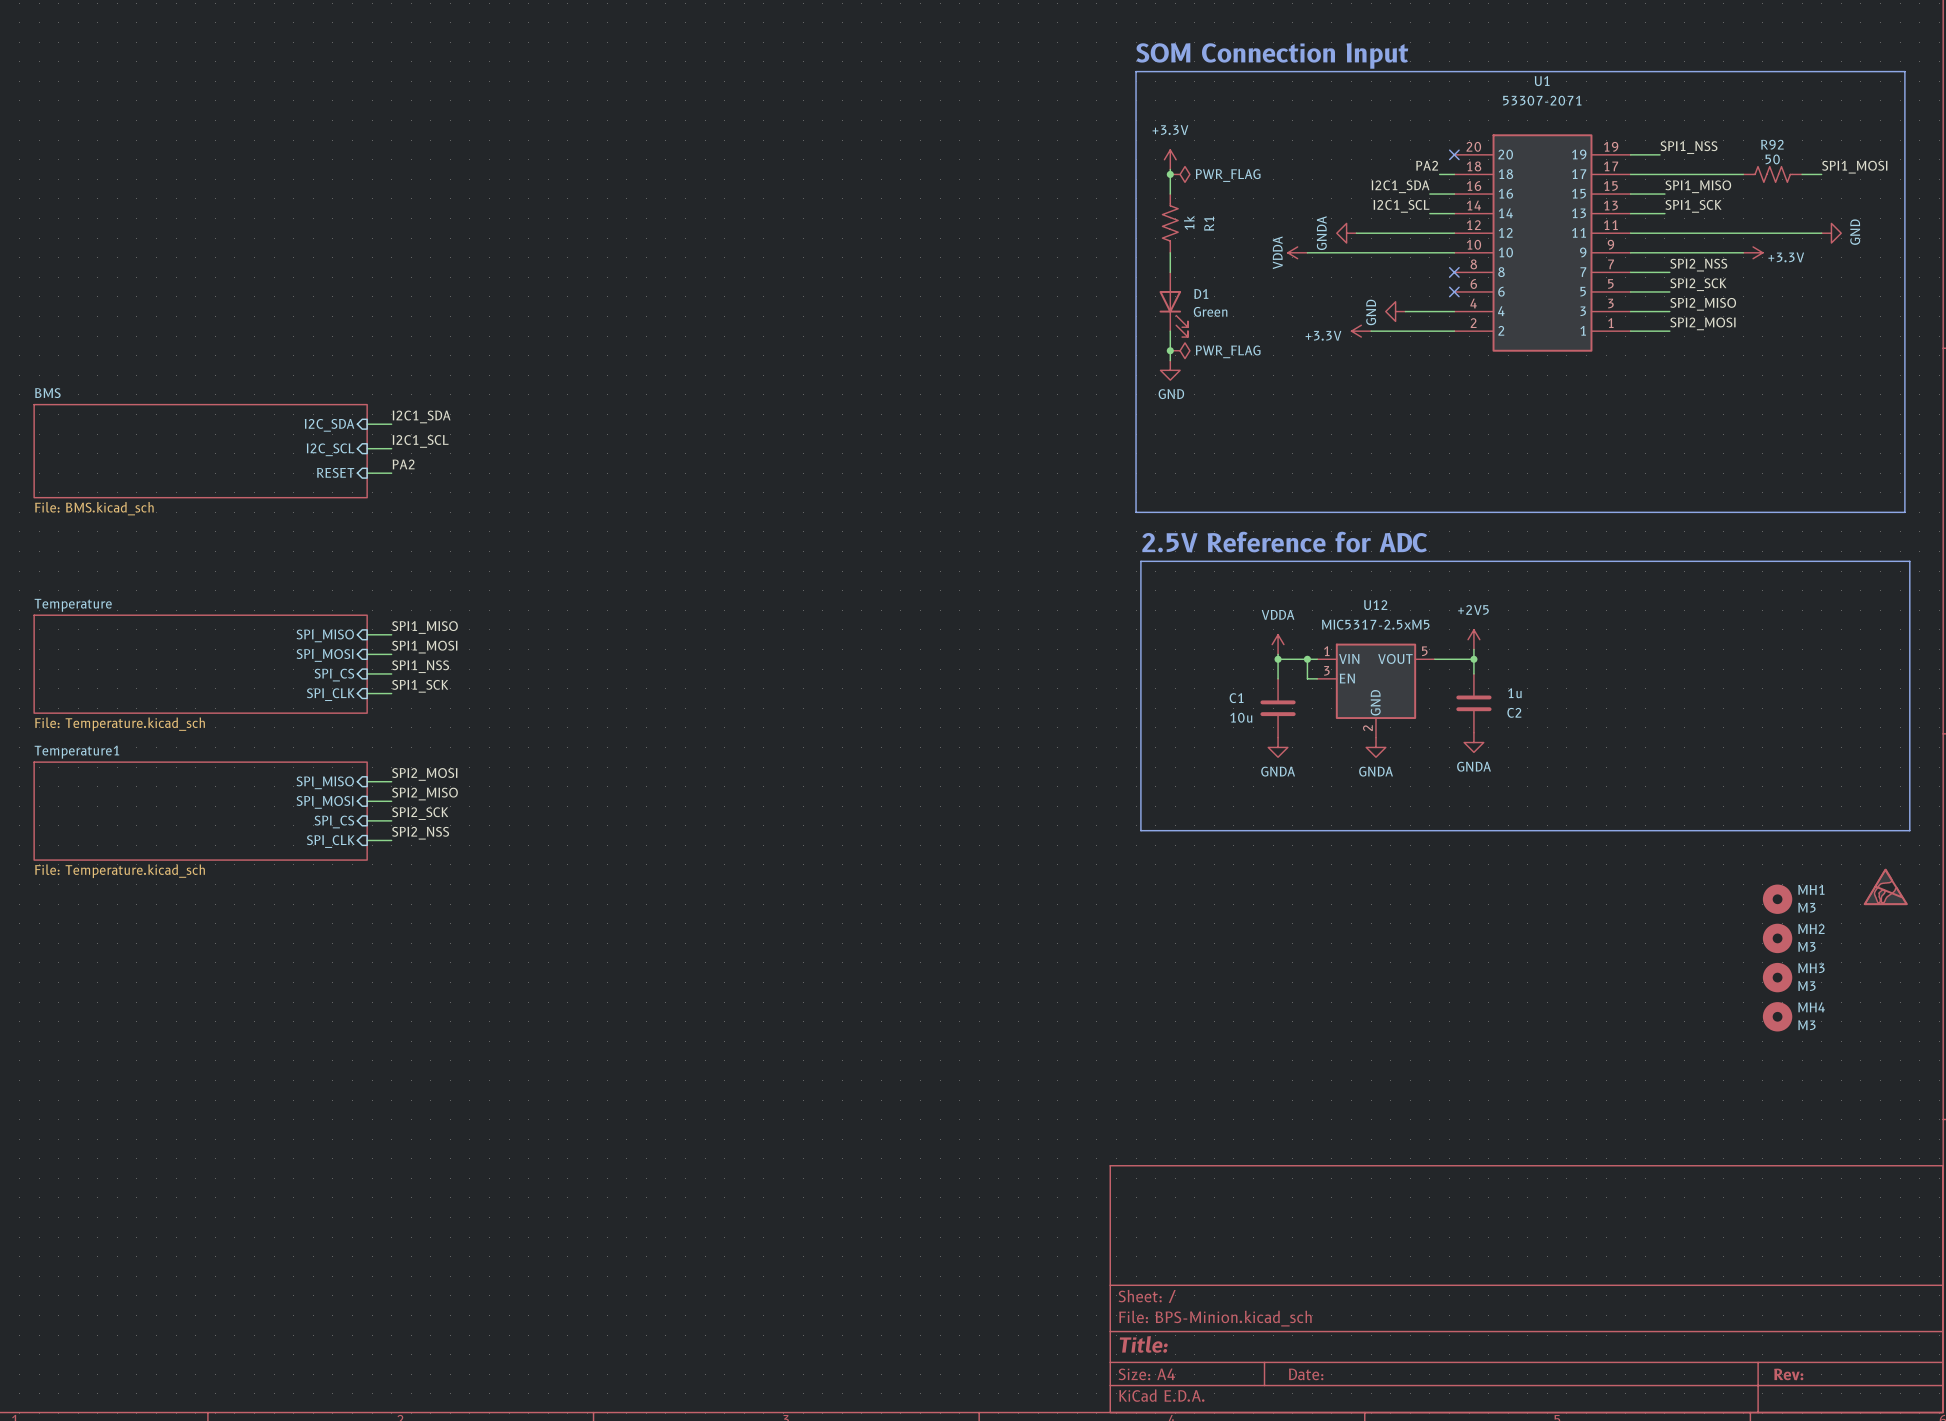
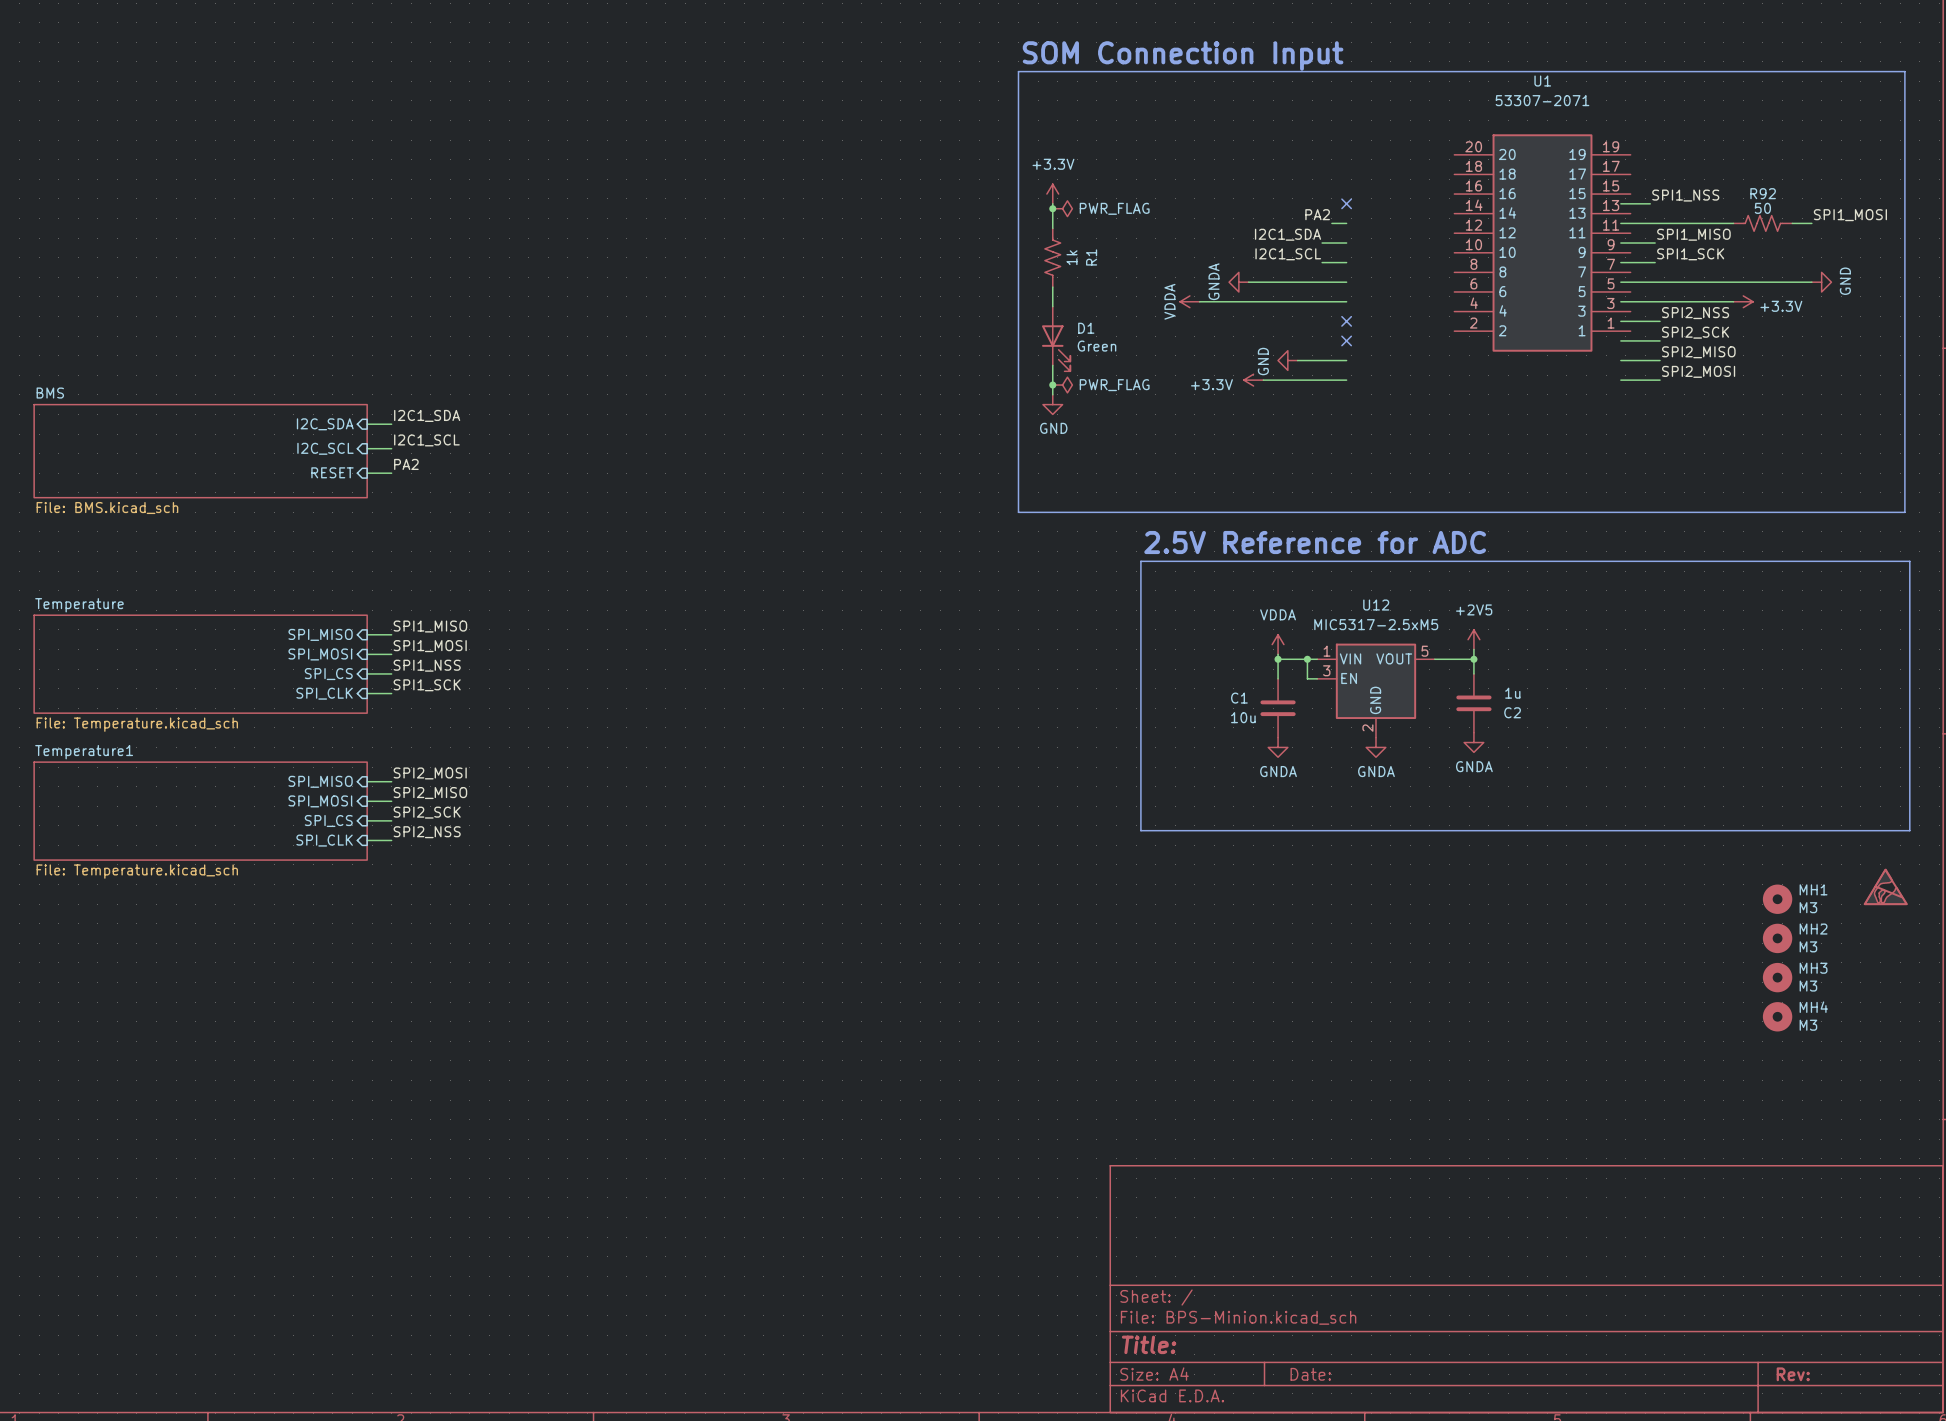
text position: SOM Connection Input (1272, 55) -> SOM Connection Input (1183, 55)
line: (1136, 71) (1136, 512) -> (1136, 71) (1018, 71) (1018, 512) (1136, 512)
label position: SPI1_NSS (1689, 147) -> SPI1_NSS (1685, 195)
no-connect mark: (1454, 154) -> none
wire: (1630, 154) (1660, 154) -> (1620, 203) (1650, 203)
power symbol: +3.3V (1170, 159) -> none
label position: PA2 (1427, 165) -> PA2 (1317, 214)
label position: SPI1_MOSI (1854, 167) -> SPI1_MOSI (1850, 215)
wire: (1170, 169) (1170, 194) -> (1052, 203) (1052, 228)
junction: (1170, 174) -> none
power symbol: PWR_FLAG (1180, 174) -> none
wire: (1439, 174) (1454, 174) -> (1331, 223) (1346, 223)
wire: (1630, 174) (1743, 174) -> (1620, 223) (1733, 223)
R92 position: (1772, 174) -> (1762, 223)
wire: (1802, 174) (1821, 174) -> (1792, 223) (1811, 223)
label position: I2C1_SDA (1400, 186) -> I2C1_SDA (1288, 234)
label position: SPI1_MISO (1698, 186) -> SPI1_MISO (1693, 234)
power symbol: none -> +3.3V (1052, 194)
wire: (1429, 194) (1454, 194) -> (1322, 243) (1346, 243)
wire: (1630, 194) (1664, 194) -> (1620, 243) (1655, 243)
no-connect mark: none -> (1346, 203)
label position: I2C1_SCL (1401, 206) -> I2C1_SCL (1288, 254)
label position: SPI1_SCK (1693, 206) -> SPI1_SCK (1690, 254)
junction: none -> (1052, 208)
power symbol: none -> PWR_FLAG (1062, 208)
wire: (1429, 213) (1454, 213) -> (1322, 262) (1346, 262)
wire: (1630, 213) (1664, 213) -> (1620, 262) (1655, 262)
R1 position: (1170, 223) -> (1052, 257)
power symbol position: GNDA (1346, 233) -> GNDA (1238, 282)
wire: (1356, 233) (1454, 233) -> (1248, 282) (1346, 282)
wire: (1630, 233) (1821, 233) -> (1620, 282) (1811, 282)
power symbol position: GND (1831, 233) -> GND (1821, 282)
wire: (1170, 252) (1170, 272) -> (1052, 287) (1052, 306)
power symbol position: VDDA (1297, 252) -> VDDA (1189, 301)
wire: (1307, 252) (1454, 252) -> (1199, 301) (1346, 301)
wire: (1630, 252) (1743, 252) -> (1620, 301) (1733, 301)
power symbol position: +3.3V (1753, 252) -> +3.3V (1743, 301)
label position: SPI2_NSS (1698, 265) -> SPI2_NSS (1695, 313)
no-connect mark: (1454, 272) -> none
wire: (1630, 272) (1669, 272) -> (1620, 321) (1660, 321)
label position: SPI2_SCK (1698, 284) -> SPI2_SCK (1695, 332)
no-connect mark: (1454, 291) -> none
wire: (1630, 291) (1669, 291) -> (1620, 340) (1660, 340)
D1 position: (1173, 304) -> (1056, 338)
label position: SPI2_MISO (1703, 304) -> SPI2_MISO (1698, 352)
power symbol: GND (1395, 311) -> none
wire: (1405, 311) (1454, 311) -> (1297, 360) (1346, 360)
wire: (1630, 311) (1669, 311) -> (1620, 360) (1660, 360)
no-connect mark: none -> (1346, 321)
label position: SPI2_MOSI (1702, 323) -> SPI2_MOSI (1698, 371)
wire: (1170, 331) (1170, 360) -> (1052, 365) (1052, 394)
power symbol: +3.3V (1361, 331) -> none
wire: (1371, 331) (1454, 331) -> (1263, 380) (1346, 380)
wire: (1630, 331) (1669, 331) -> (1620, 380) (1660, 380)
no-connect mark: none -> (1346, 340)
junction: (1170, 350) -> none
power symbol: PWR_FLAG (1180, 350) -> none
power symbol: none -> GND (1287, 360)
power symbol: GND (1170, 370) -> none
power symbol: none -> +3.3V (1253, 380)
junction: none -> (1052, 385)
power symbol: none -> PWR_FLAG (1062, 385)
power symbol: none -> GND (1052, 404)

